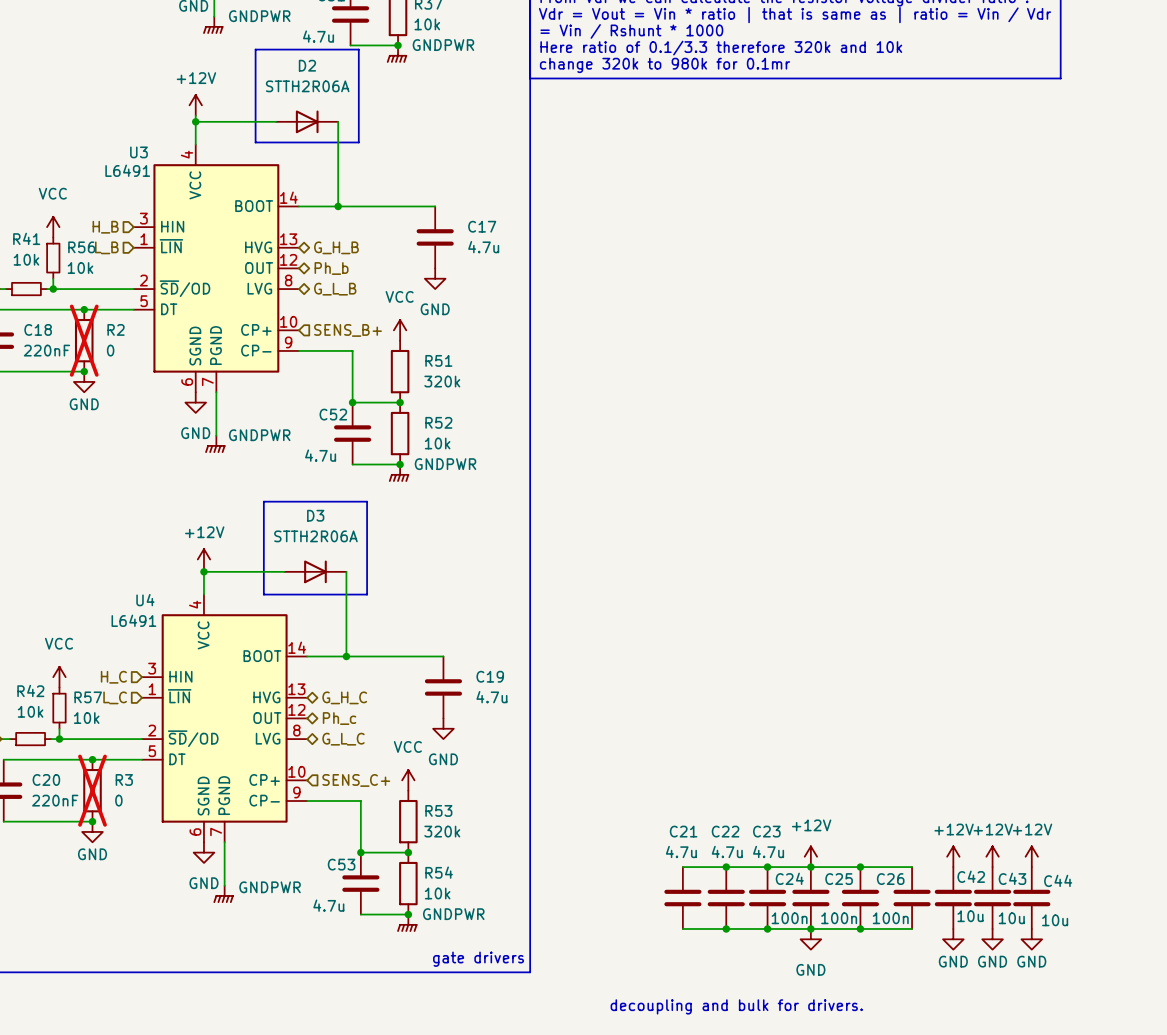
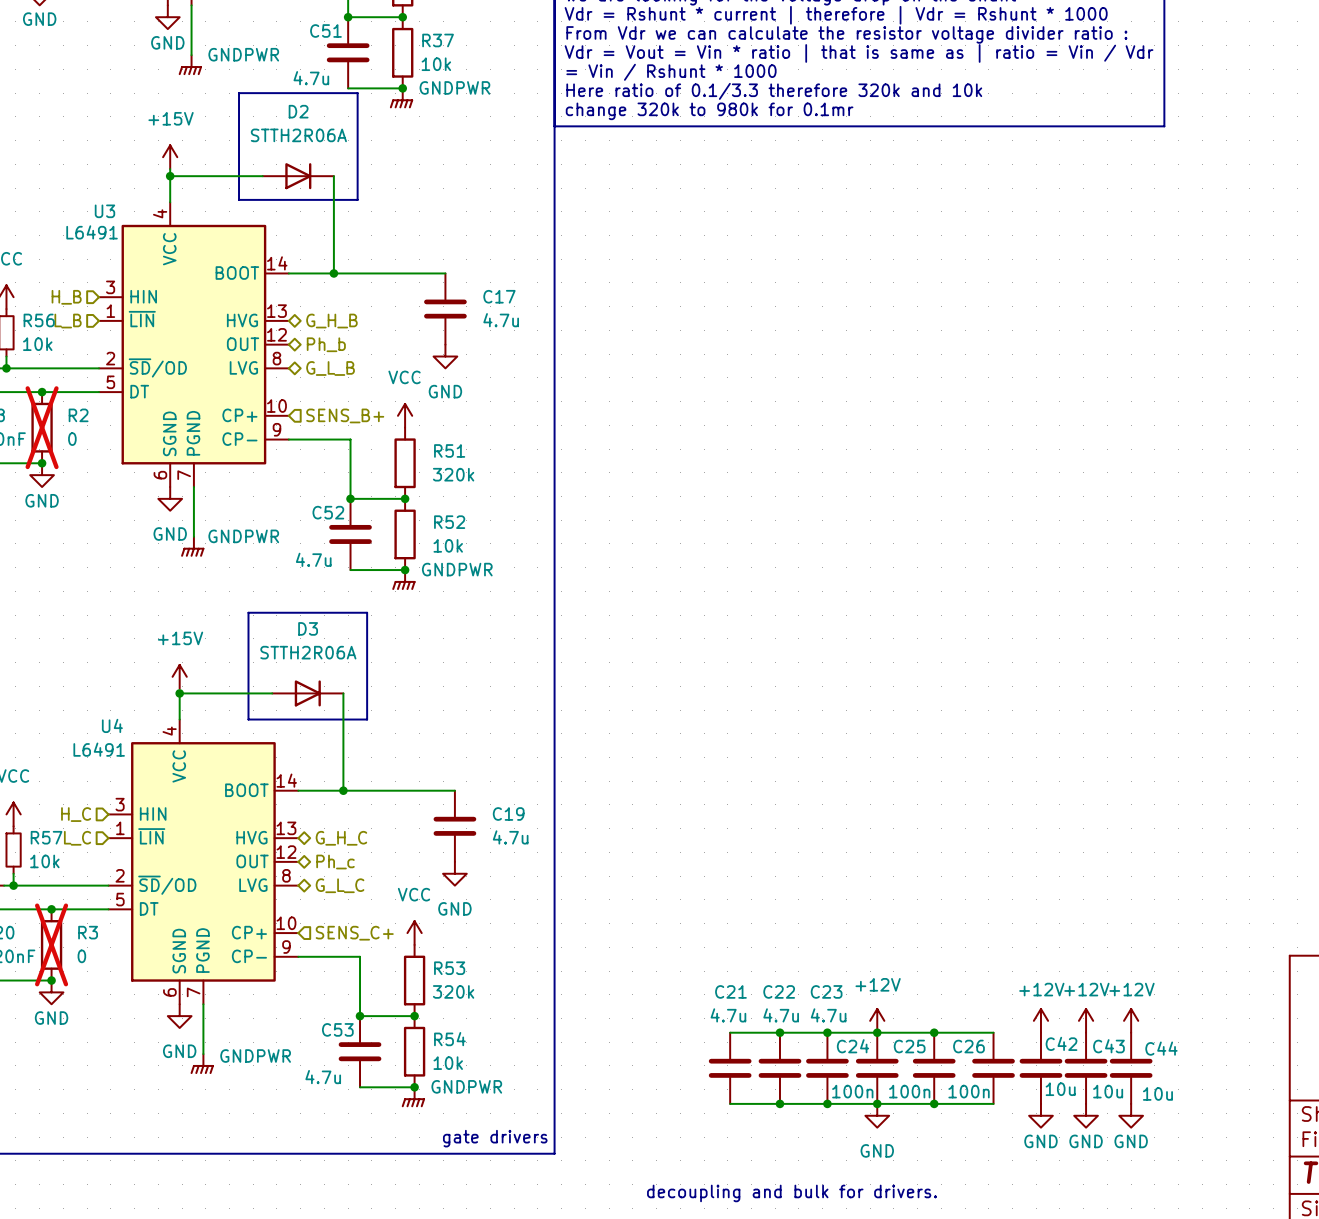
power symbol: +12V (195, 105) -> +15V (170, 157)
power symbol: +12V (203, 559) -> +15V (179, 676)

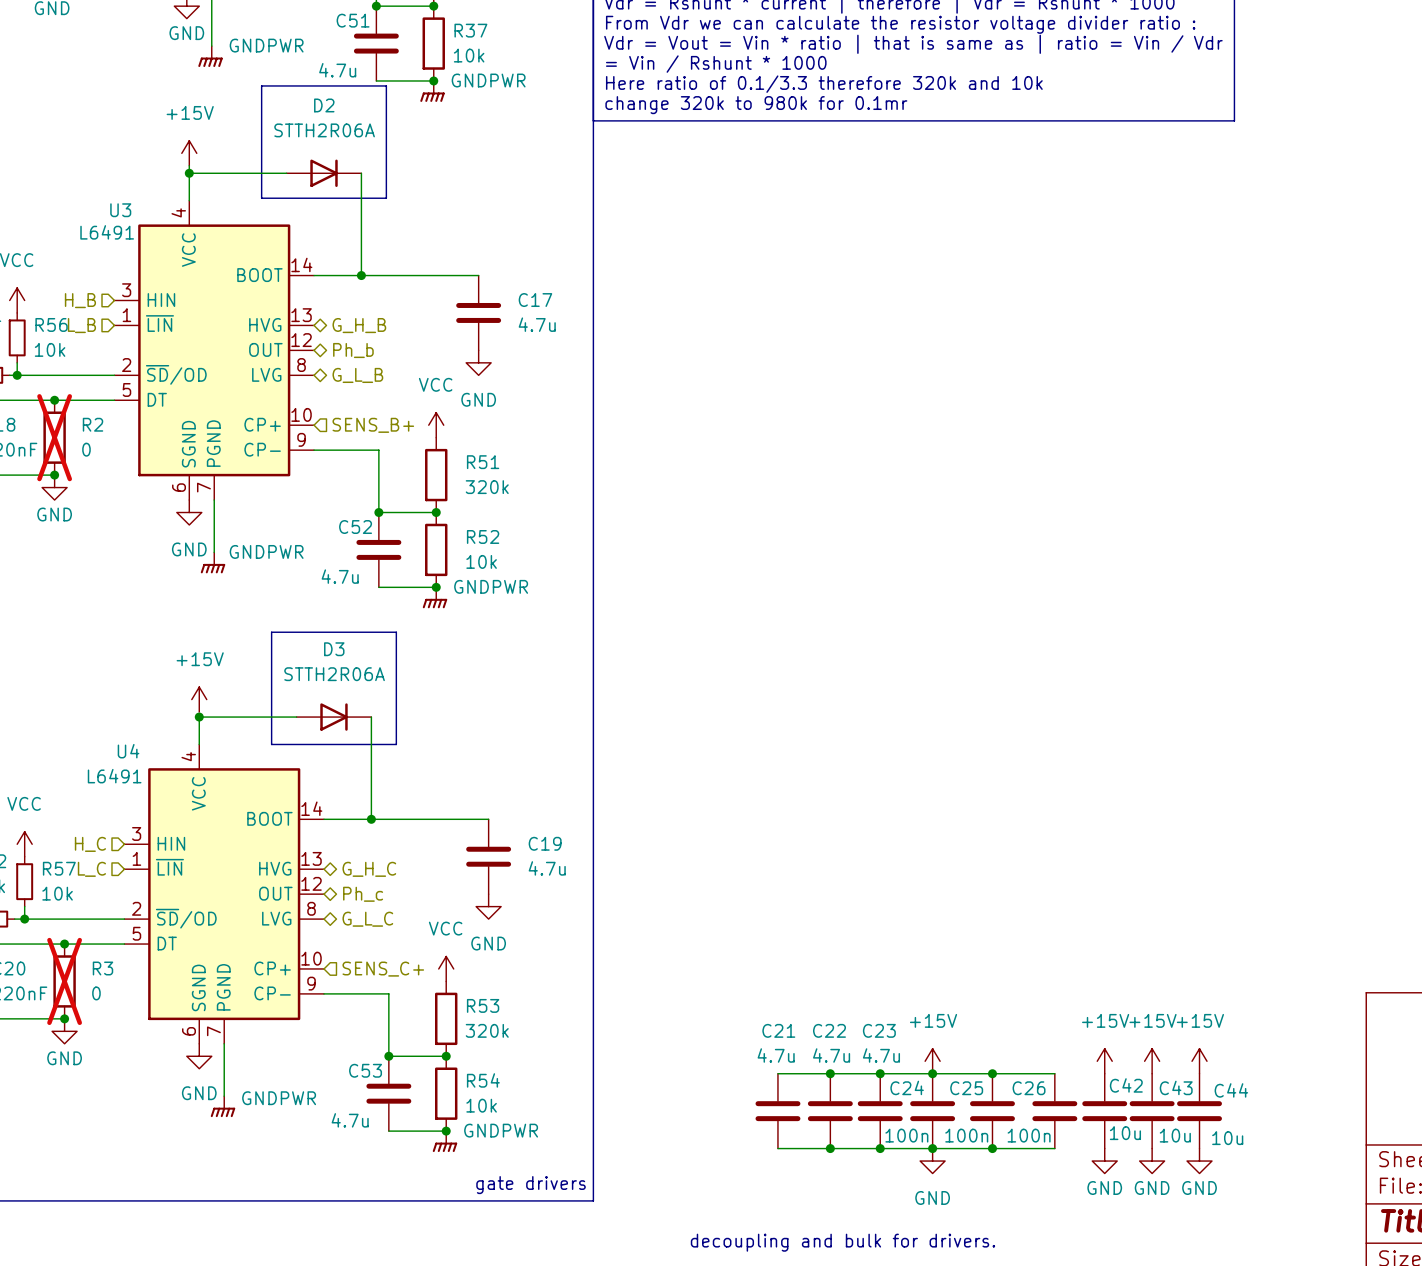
power symbol: +12V (877, 1020) -> +15V (932, 1061)
power symbol: +12V (1040, 1020) -> +15V (1104, 1061)
power symbol: +12V (1086, 1020) -> +15V (1152, 1061)
power symbol: +12V (1131, 1020) -> +15V (1199, 1061)

